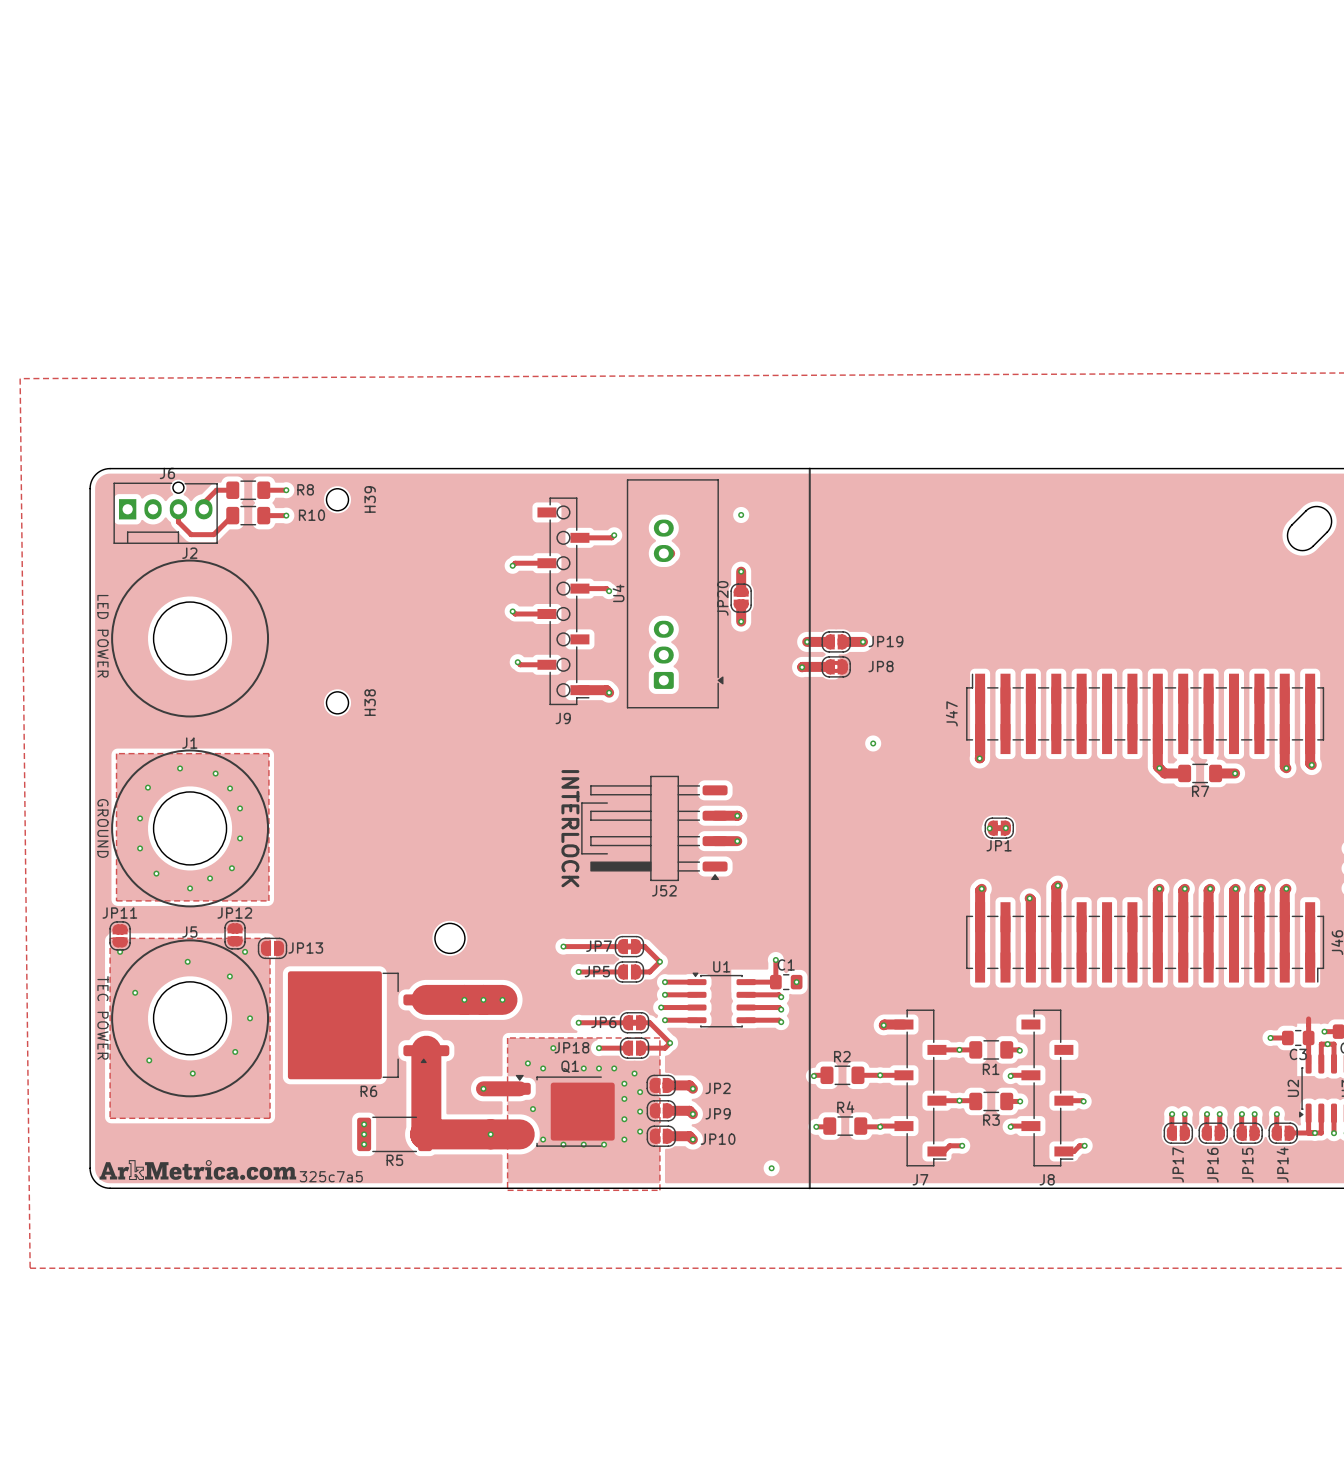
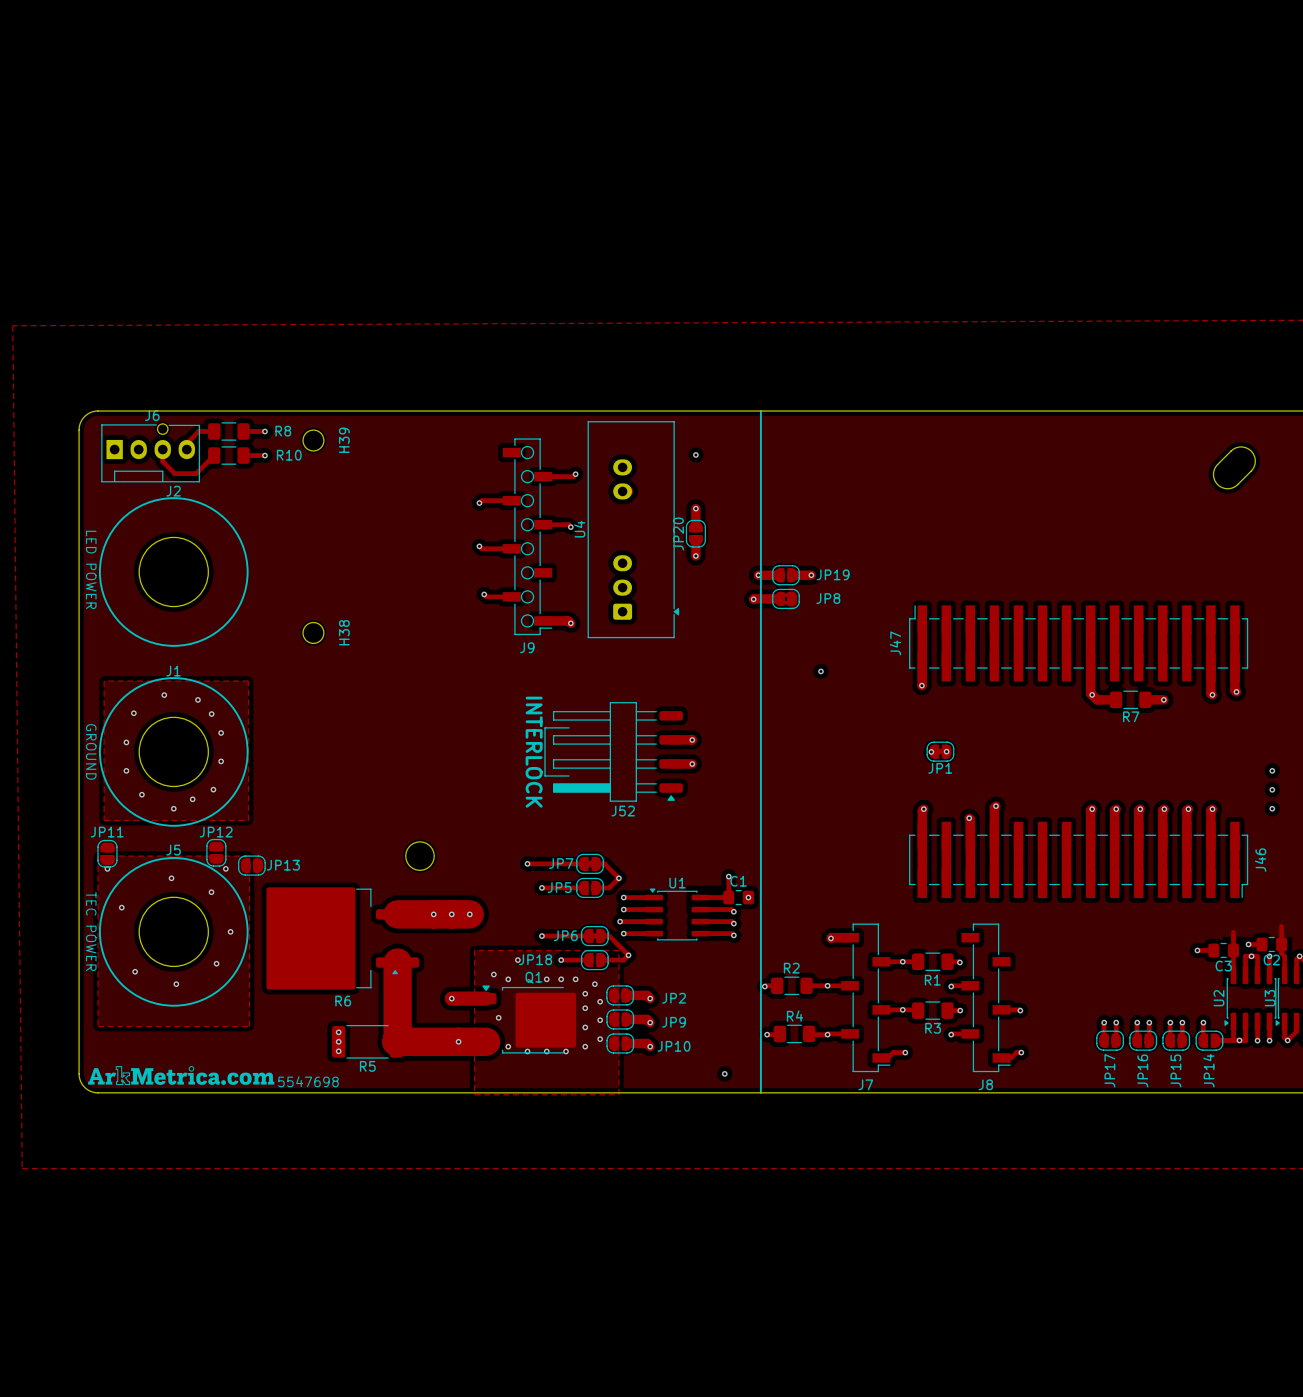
text: 325c7a5 (331, 1176) -> 5547698 (308, 1081)

